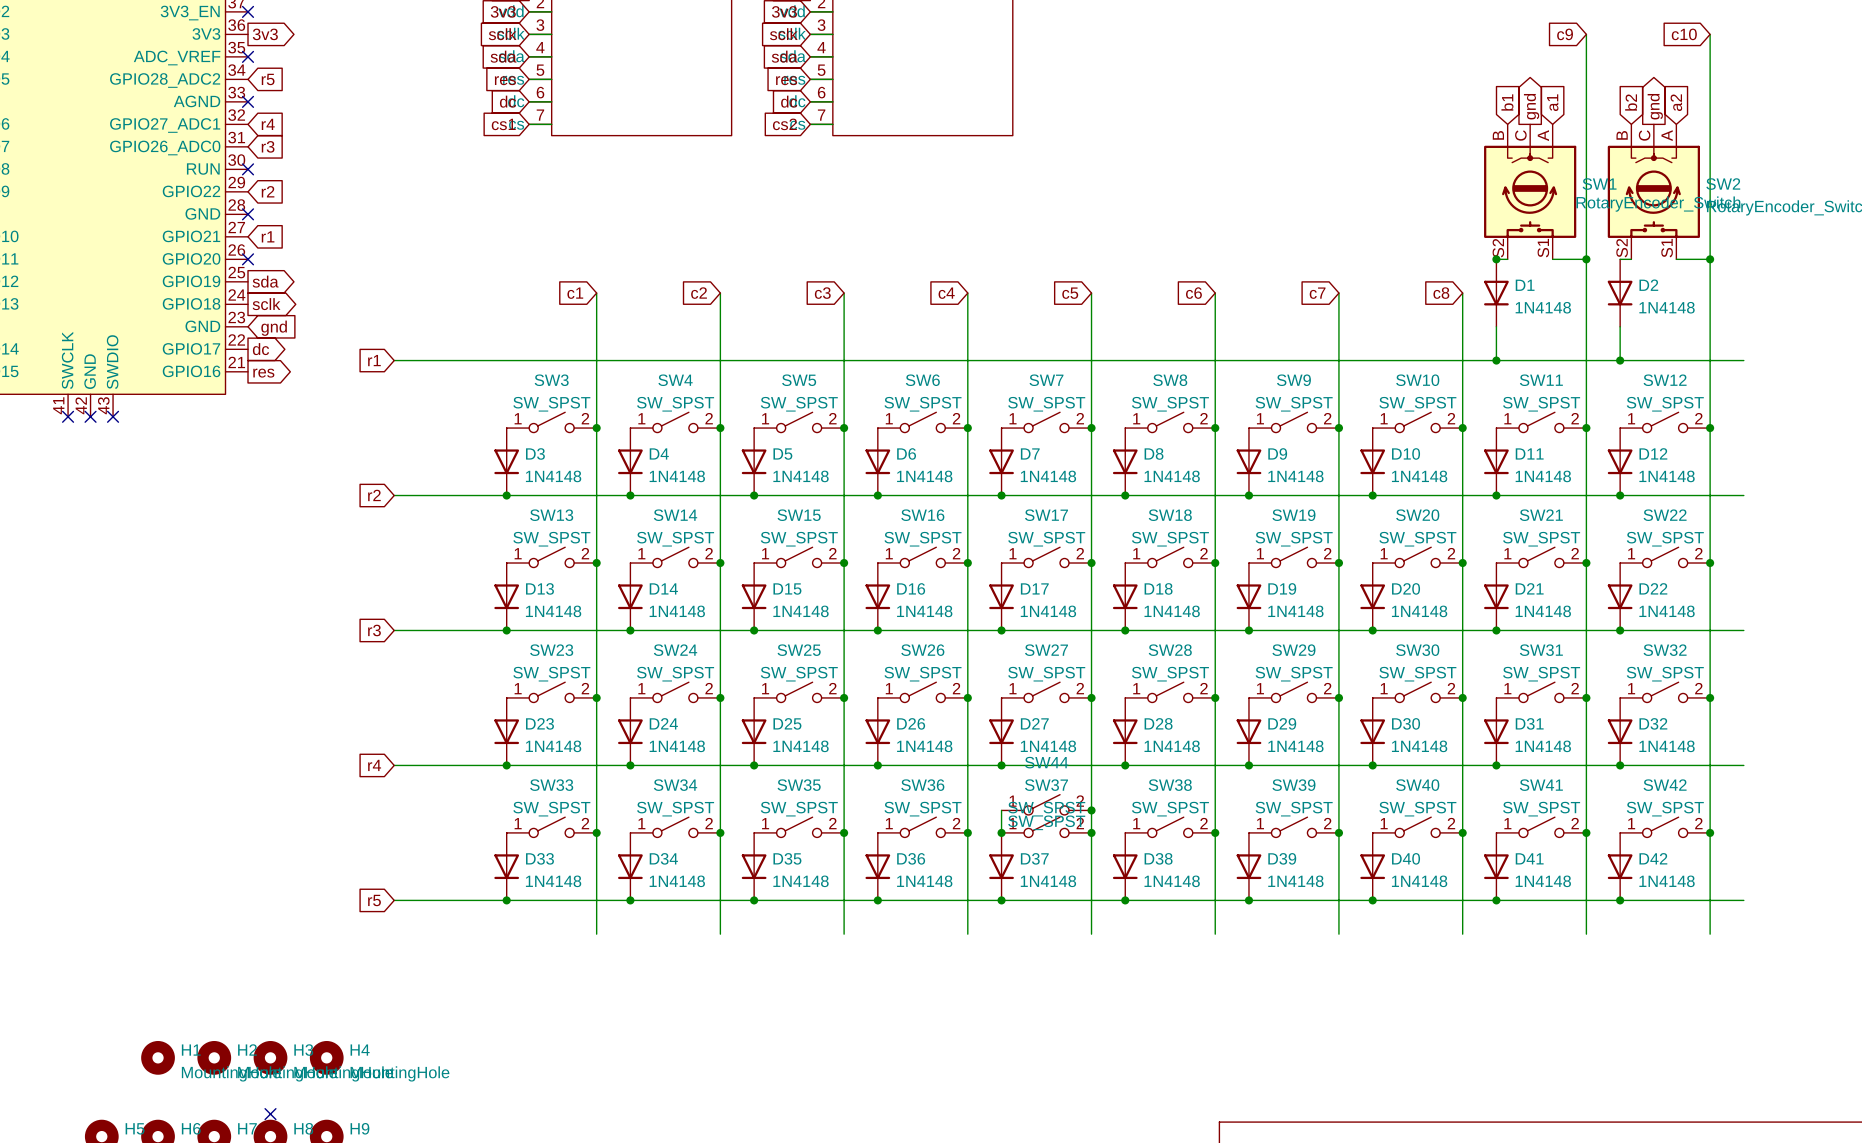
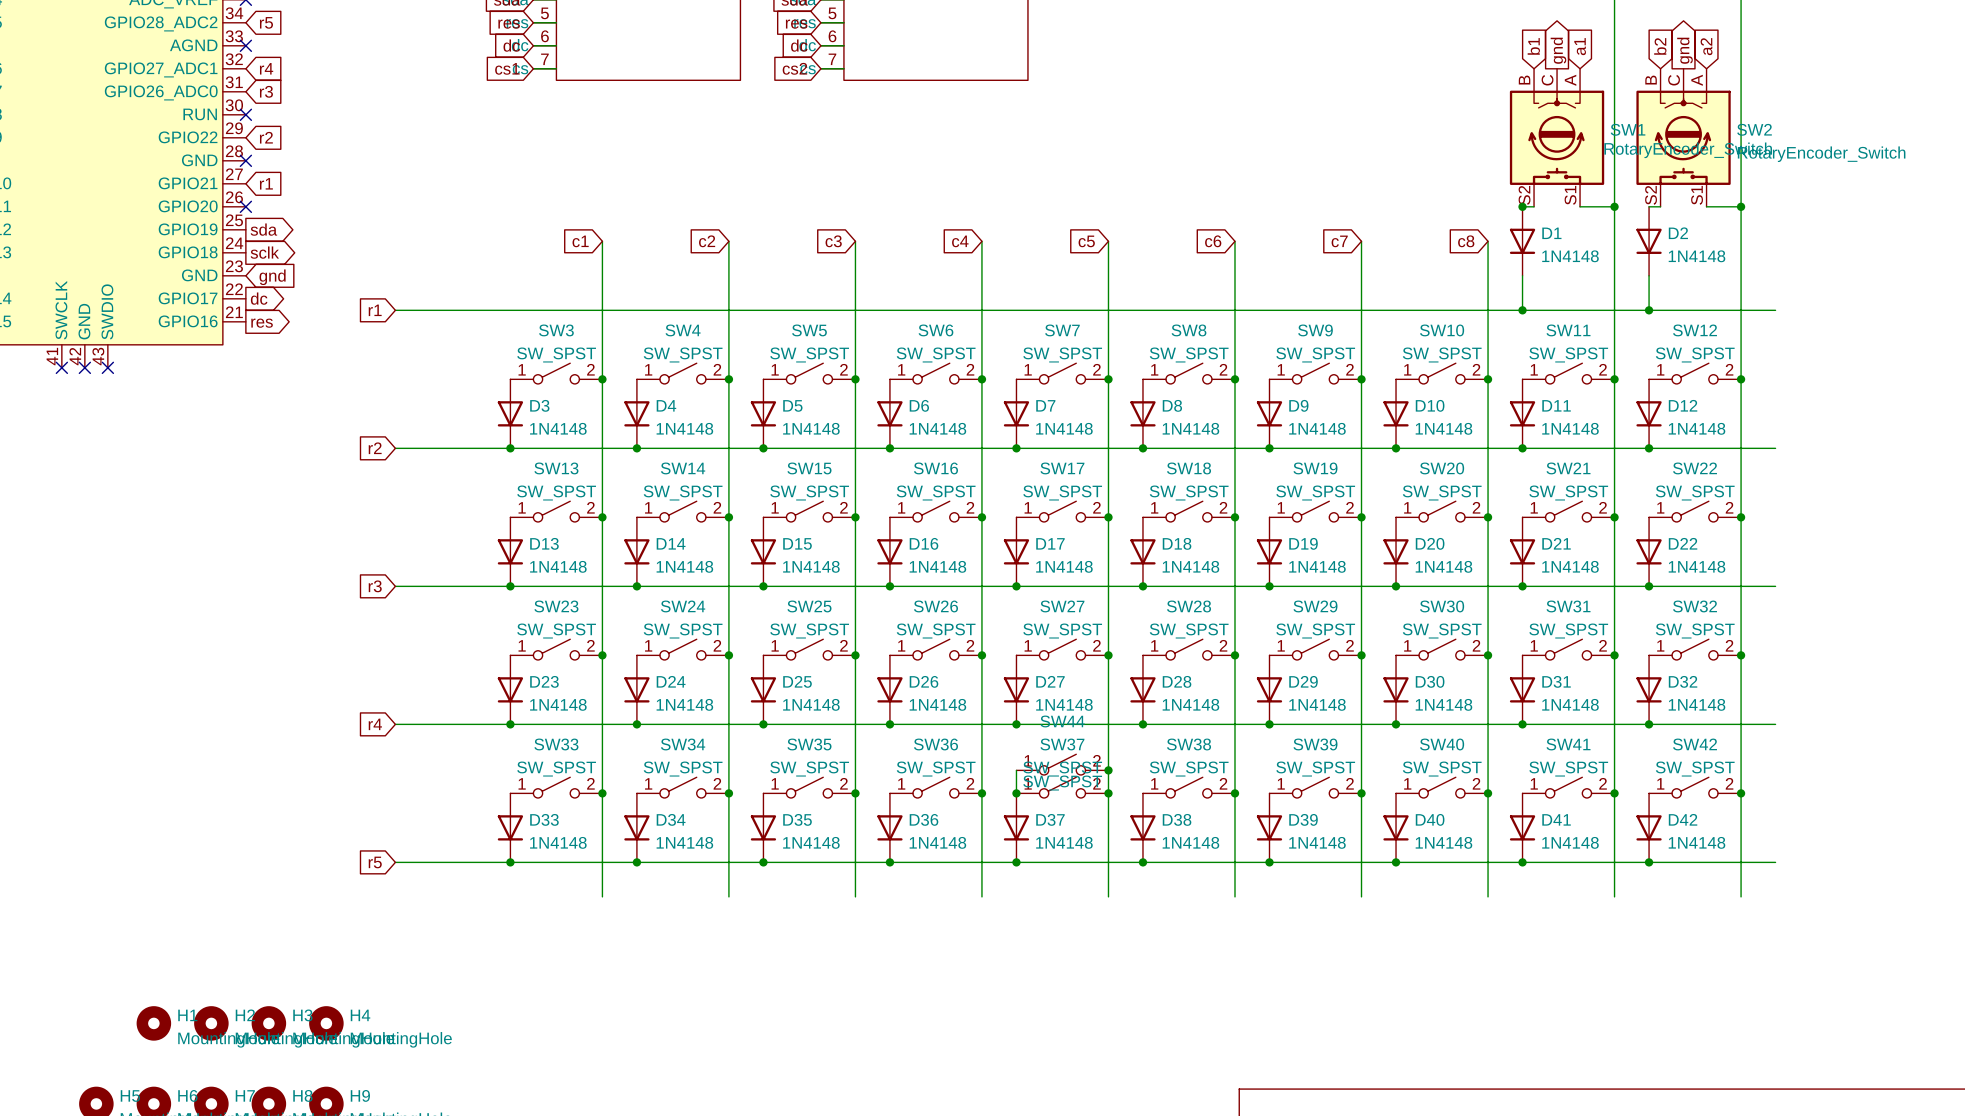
no-connect mark: (270, 1114) -> none

